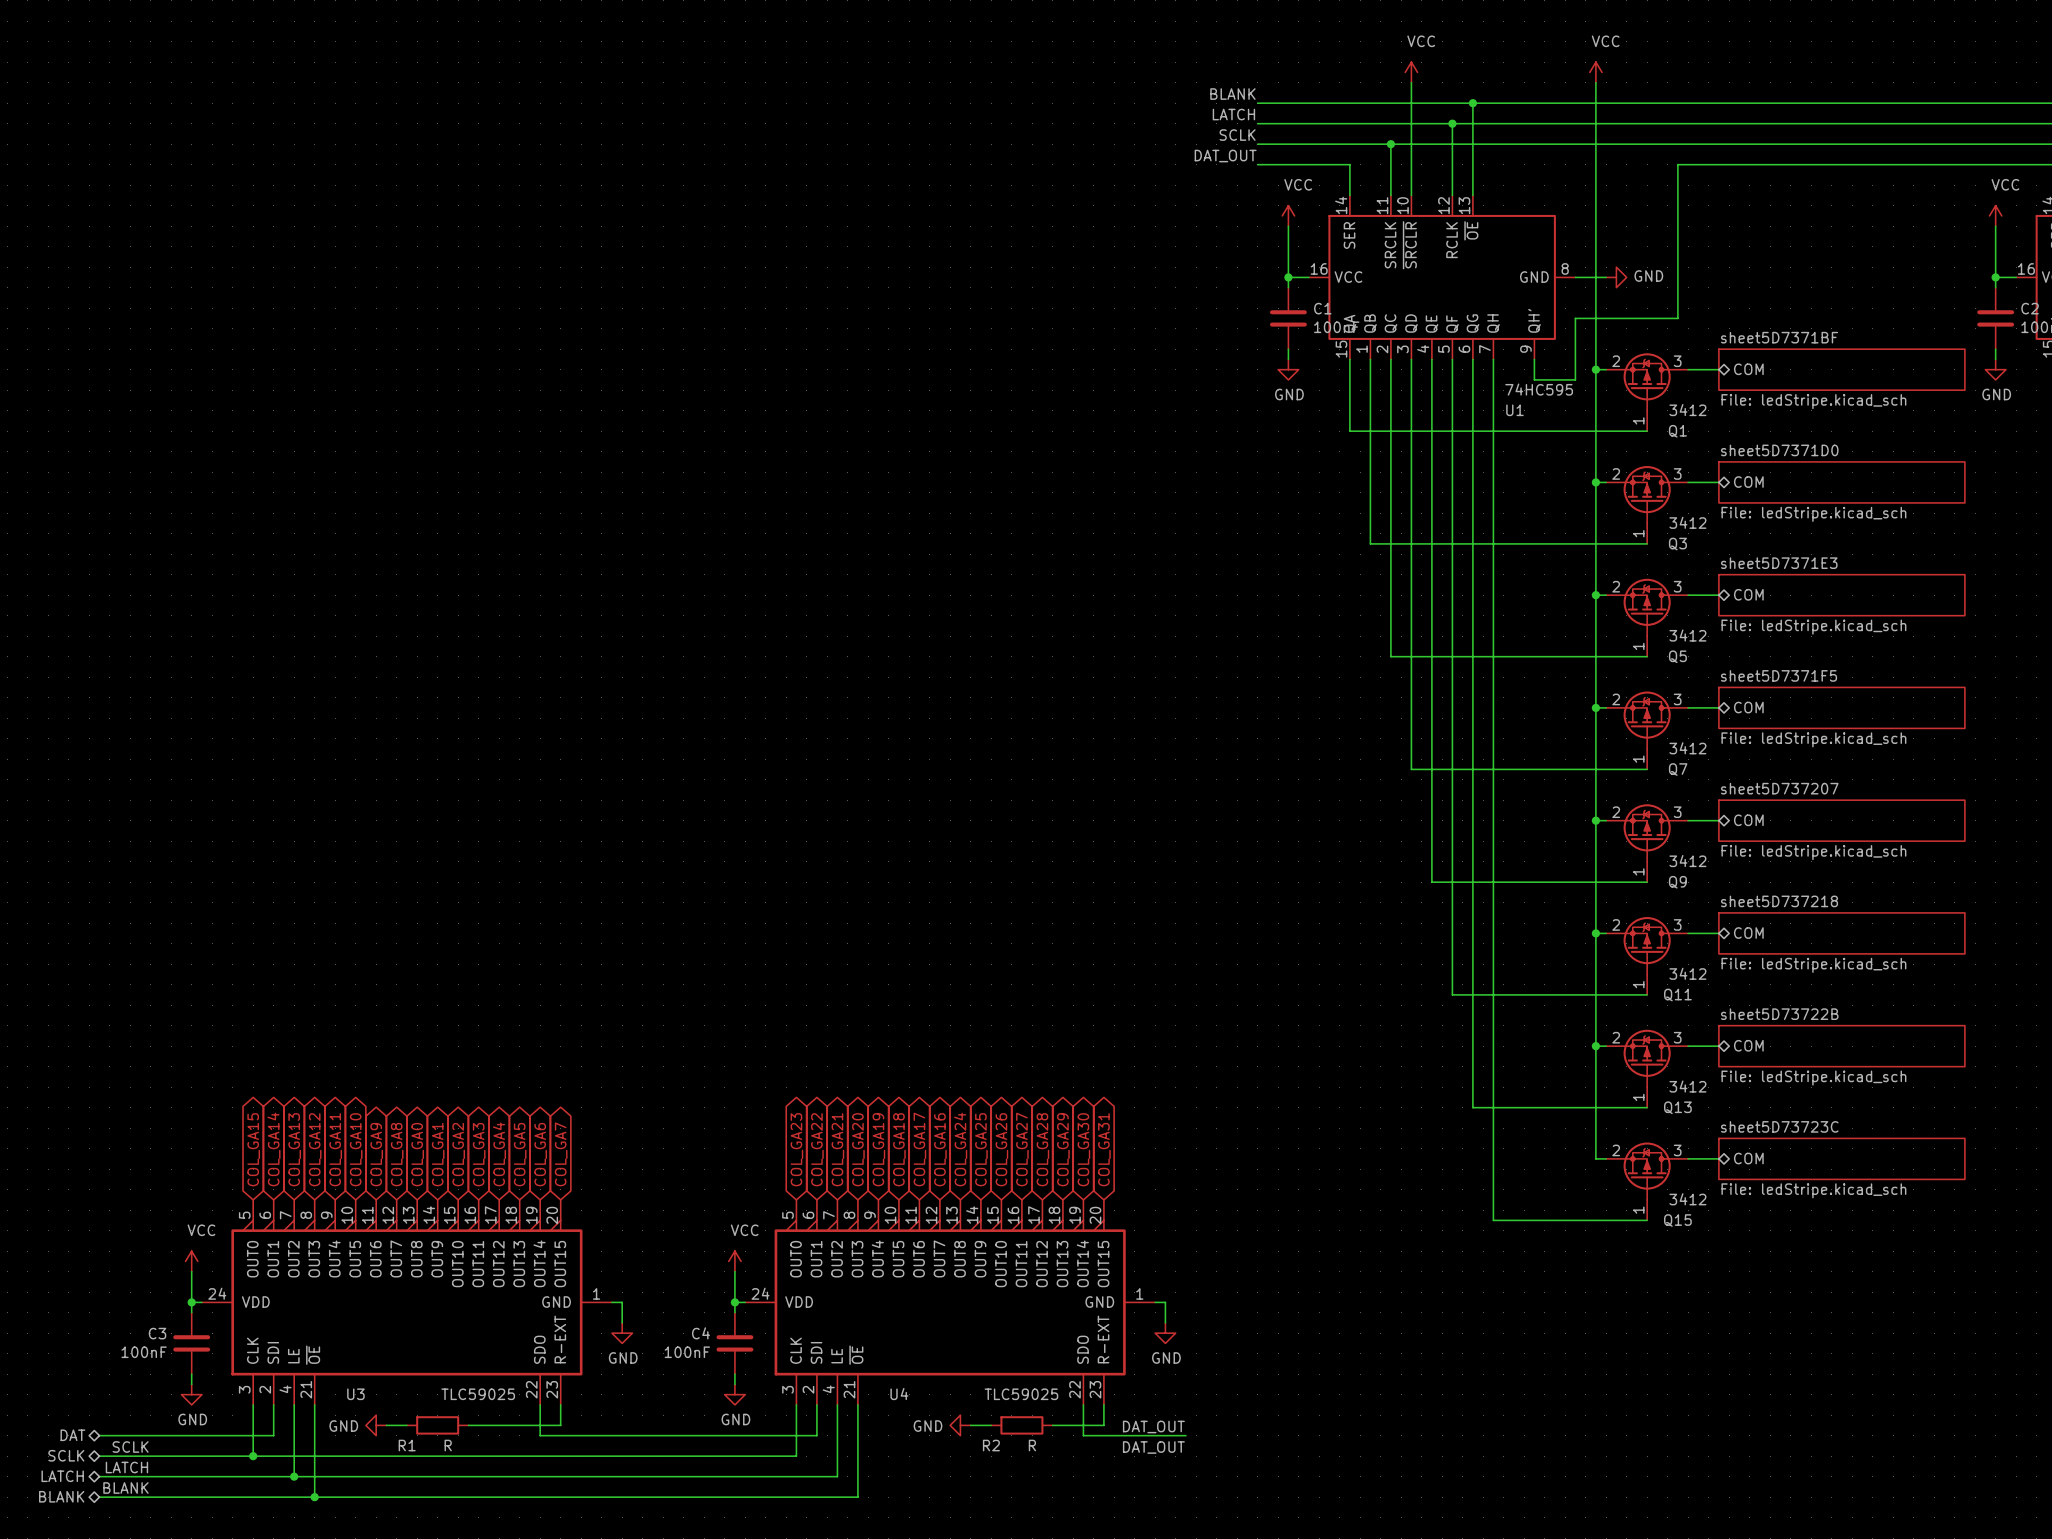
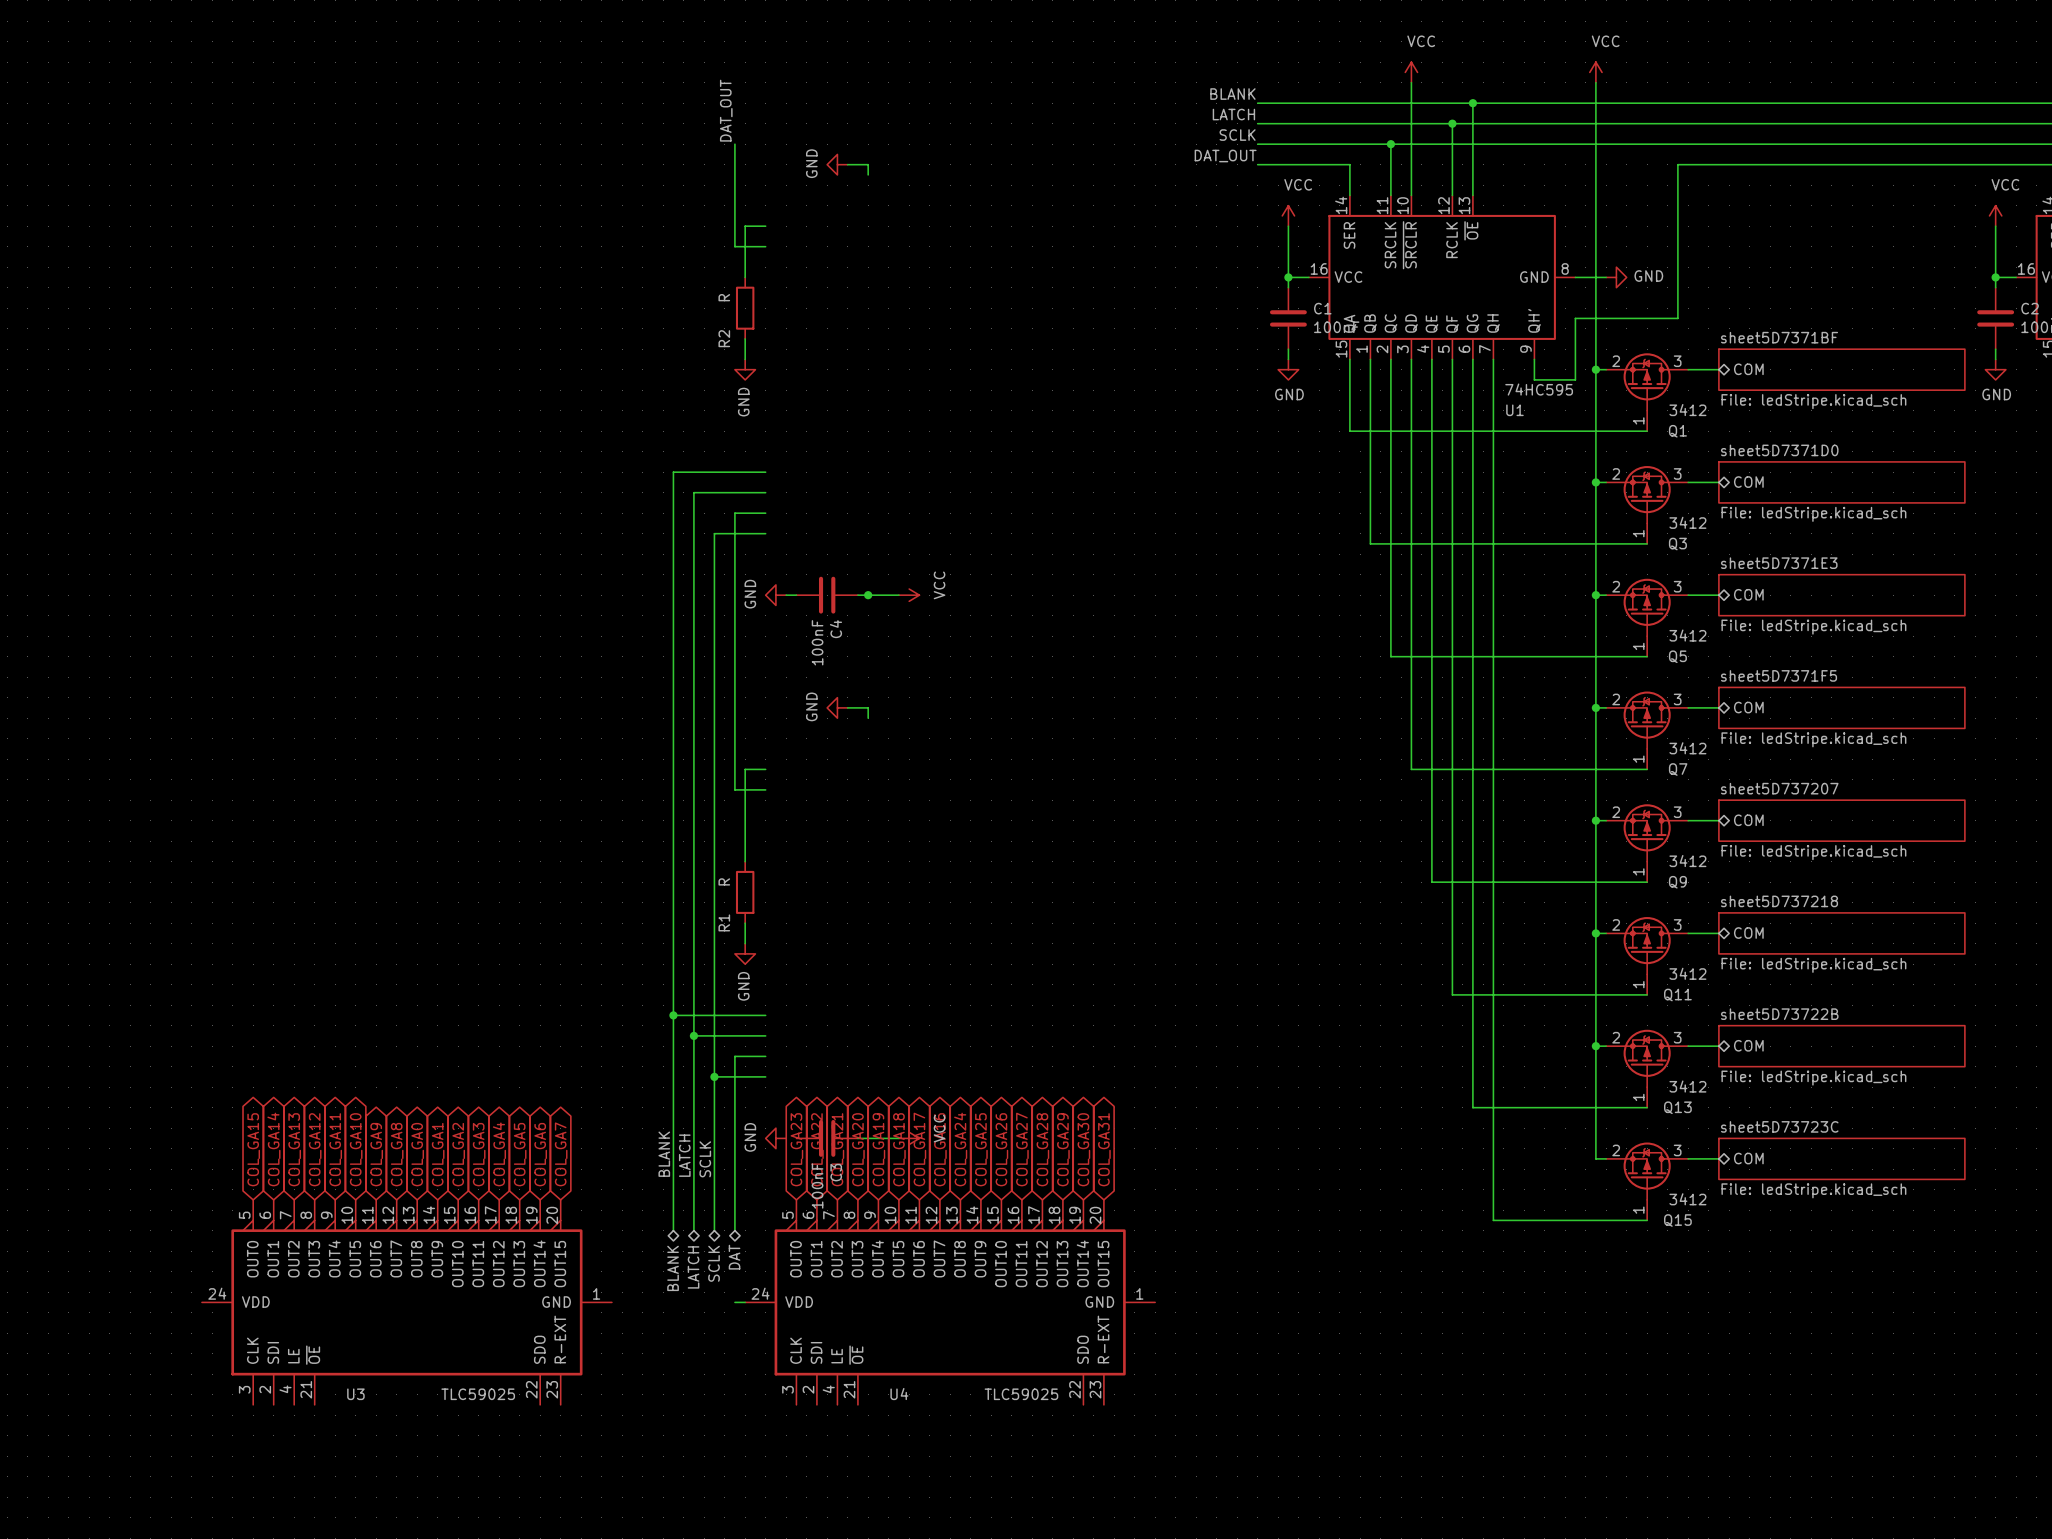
label: none -> DAT_OUT (726, 110)
wire: none -> (734, 144) (734, 246) (765, 246)
power symbol: none -> GND (837, 164)
wire: none -> (847, 164) (868, 164) (868, 174)
wire: none -> (765, 226) (745, 226) (745, 277)
wire: none -> (745, 338) (745, 359)
power symbol: none -> GND (745, 369)
wire: none -> (765, 472) (673, 472) (673, 1230)
wire: none -> (765, 492) (693, 492) (693, 1230)
wire: none -> (765, 513) (734, 513) (734, 789) (765, 789)
wire: none -> (765, 533) (714, 533) (714, 1230)
power symbol: none -> GND (775, 595)
wire: none -> (786, 595) (796, 595)
wire: none -> (857, 595) (898, 595)
junction: none -> (868, 595)
power symbol: none -> VCC (909, 595)
power symbol: none -> GND (837, 707)
wire: none -> (847, 707) (868, 707) (868, 718)
wire: none -> (765, 769) (745, 769) (745, 861)
wire: none -> (745, 923) (745, 943)
power symbol: none -> GND (745, 953)
wire: none -> (673, 1015) (765, 1015)
junction: none -> (673, 1015)
wire: none -> (693, 1035) (765, 1035)
junction: none -> (693, 1035)
wire: none -> (765, 1056) (734, 1056) (734, 1230)
wire: none -> (714, 1076) (765, 1076)
junction: none -> (714, 1076)
power symbol: none -> GND (775, 1138)
wire: none -> (857, 1138) (898, 1138)
power symbol: none -> VCC (909, 1138)
label: none -> BLANK (664, 1154)
label: none -> LATCH (684, 1155)
label: none -> SCLK (705, 1159)
hierarchical label: none -> DAT (734, 1257)
power symbol: VCC (191, 1261) -> none
power symbol: VCC (734, 1261) -> none
hierarchical label: none -> SCLK (714, 1263)
hierarchical label: none -> LATCH (693, 1267)
hierarchical label: none -> BLANK (673, 1268)
wire: (191, 1271) (191, 1312) -> none
wire: (734, 1271) (734, 1312) -> none
wire: (191, 1302) (201, 1302) -> none
junction: (191, 1302) -> none
wire: (611, 1302) (622, 1302) (622, 1322) -> none
junction: (734, 1302) -> none
wire: (1155, 1302) (1165, 1302) (1165, 1322) -> none
C3 name position: C3 (157, 1333) -> C3 (836, 1172)
power symbol: GND (622, 1333) -> none
C4 name position: C4 (700, 1333) -> C4 (835, 629)
power symbol: GND (1165, 1333) -> none
C3 rotation: 0° (191, 1343) -> 90° clockwise (827, 1138)
C3 position: (191, 1343) -> (827, 1138)
C4 rotation: 0° (734, 1343) -> 90° clockwise (827, 595)
C4 position: (734, 1343) -> (827, 595)
C3 value position: 100nF (144, 1352) -> 100nF (817, 1186)
C4 value position: 100nF (687, 1352) -> 100nF (817, 642)
wire: (191, 1374) (191, 1384) -> none
wire: (734, 1374) (734, 1384) -> none
power symbol: GND (191, 1394) -> none
power symbol: GND (734, 1394) -> none
wire: (253, 1404) (253, 1456) -> none
wire: (273, 1404) (273, 1435) (99, 1435) -> none
wire: (294, 1404) (294, 1476) -> none
wire: (314, 1404) (314, 1497) -> none
wire: (540, 1404) (540, 1435) (816, 1435) (816, 1404) -> none
wire: (560, 1404) (560, 1425) (468, 1425) -> none
wire: (796, 1404) (796, 1456) (99, 1456) -> none
wire: (837, 1404) (837, 1476) (99, 1476) -> none
wire: (857, 1404) (857, 1497) (99, 1497) -> none
wire: (1083, 1404) (1083, 1435) (1185, 1435) -> none
wire: (1103, 1404) (1103, 1425) (1052, 1425) -> none
power symbol: GND (376, 1425) -> none
wire: (386, 1425) (406, 1425) -> none
R1 rotation: 0° (437, 1425) -> 90° clockwise (745, 892)
R1 position: (437, 1425) -> (745, 892)
power symbol: GND (960, 1425) -> none
wire: (970, 1425) (991, 1425) -> none
R2 rotation: 0° (1021, 1425) -> 90° clockwise (745, 308)
R2 position: (1021, 1425) -> (745, 308)
label: DAT_OUT (1153, 1426) -> none
hierarchical label: DAT (72, 1435) -> none
R1 value position: R (448, 1445) -> R (724, 881)
R2 value position: R (1032, 1445) -> R (724, 297)
label: SCLK (130, 1447) -> none
label: DAT_OUT (1153, 1447) -> none
hierarchical label: SCLK (66, 1455) -> none
junction: (253, 1456) -> none
label: LATCH (126, 1467) -> none
hierarchical label: LATCH (62, 1476) -> none
junction: (294, 1476) -> none
label: BLANK (125, 1488) -> none
hierarchical label: BLANK (61, 1496) -> none
junction: (314, 1497) -> none

